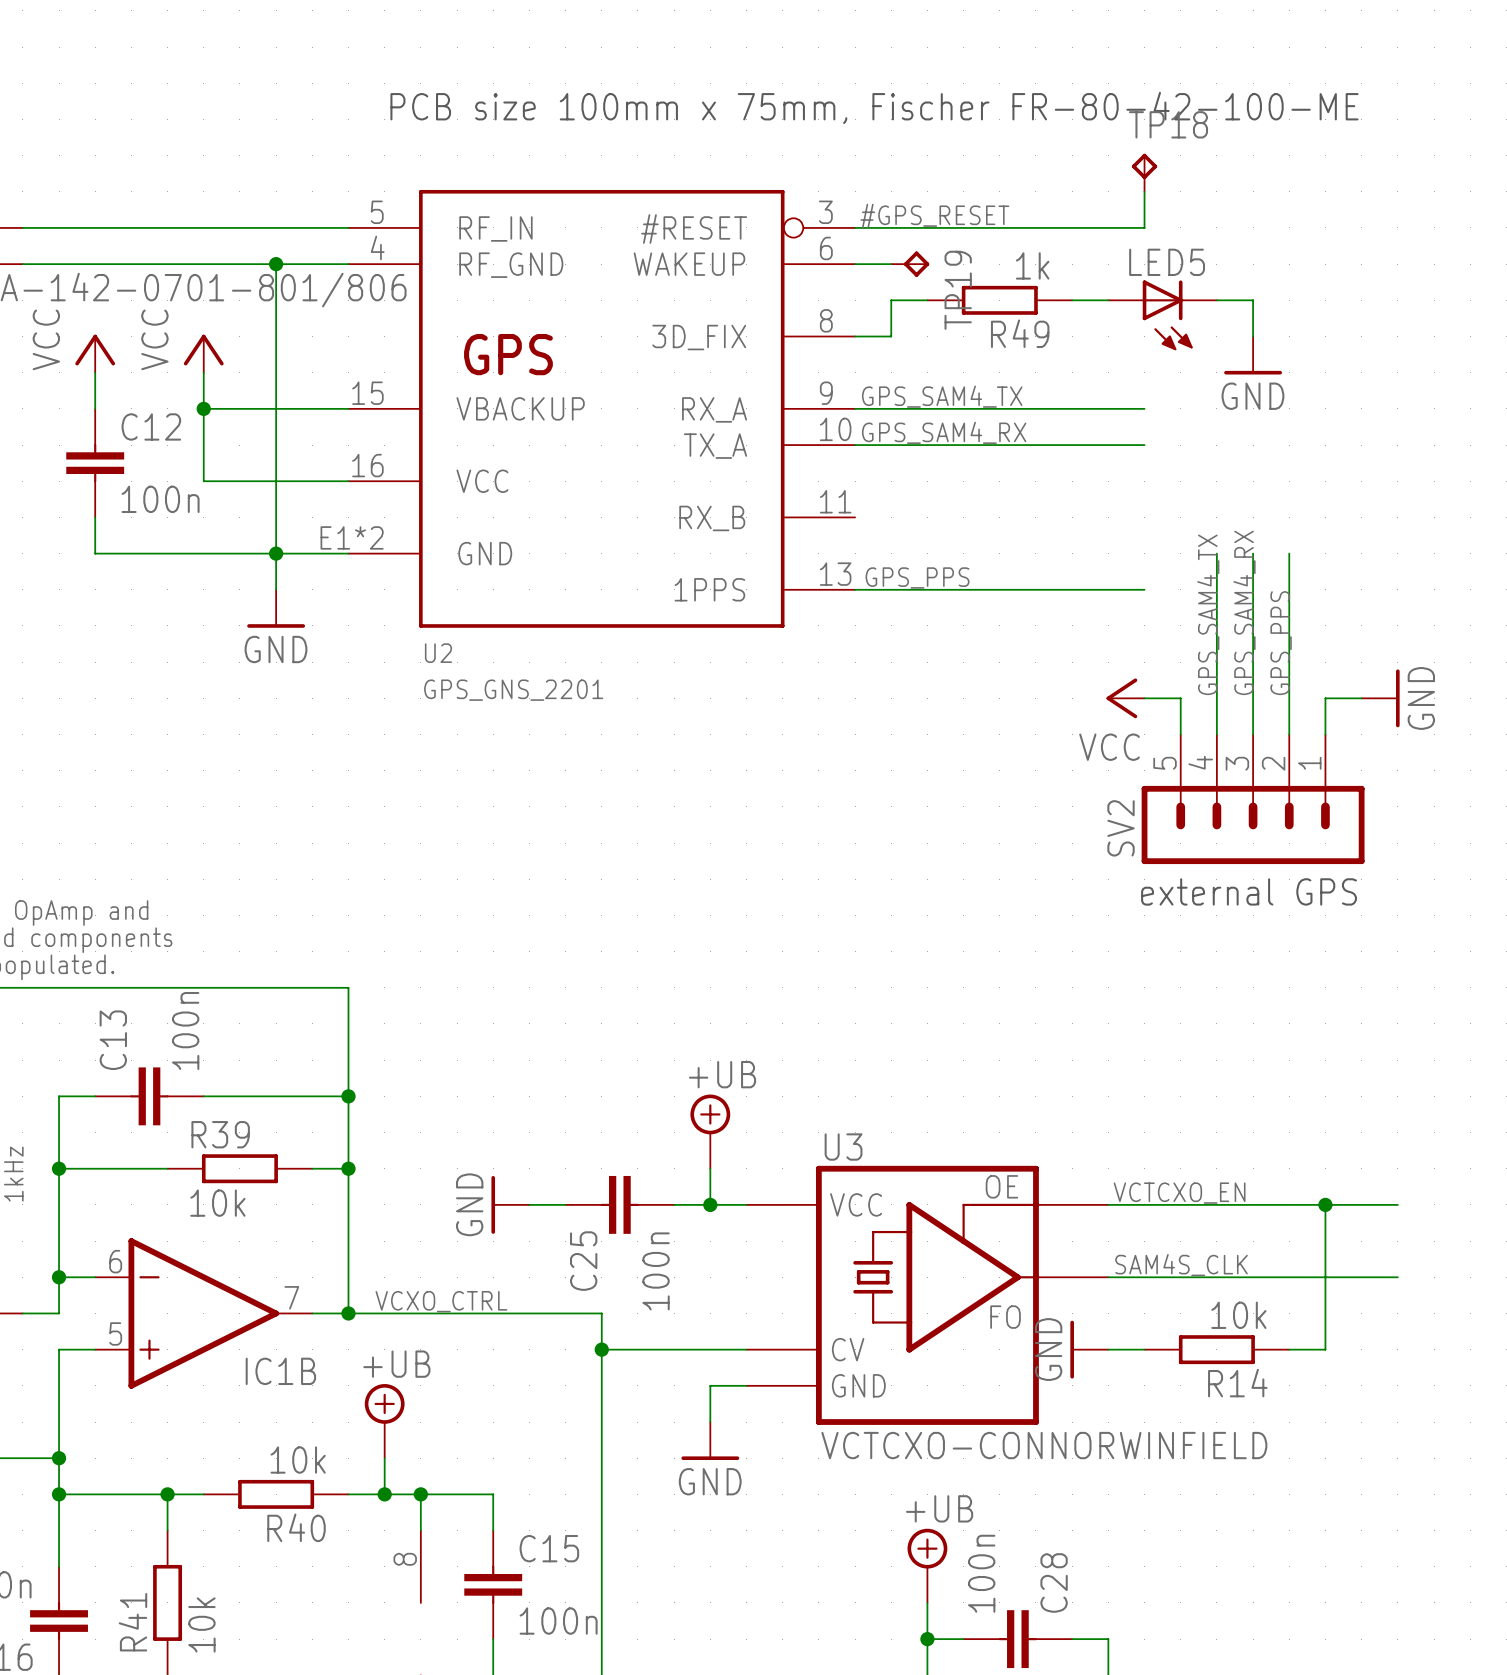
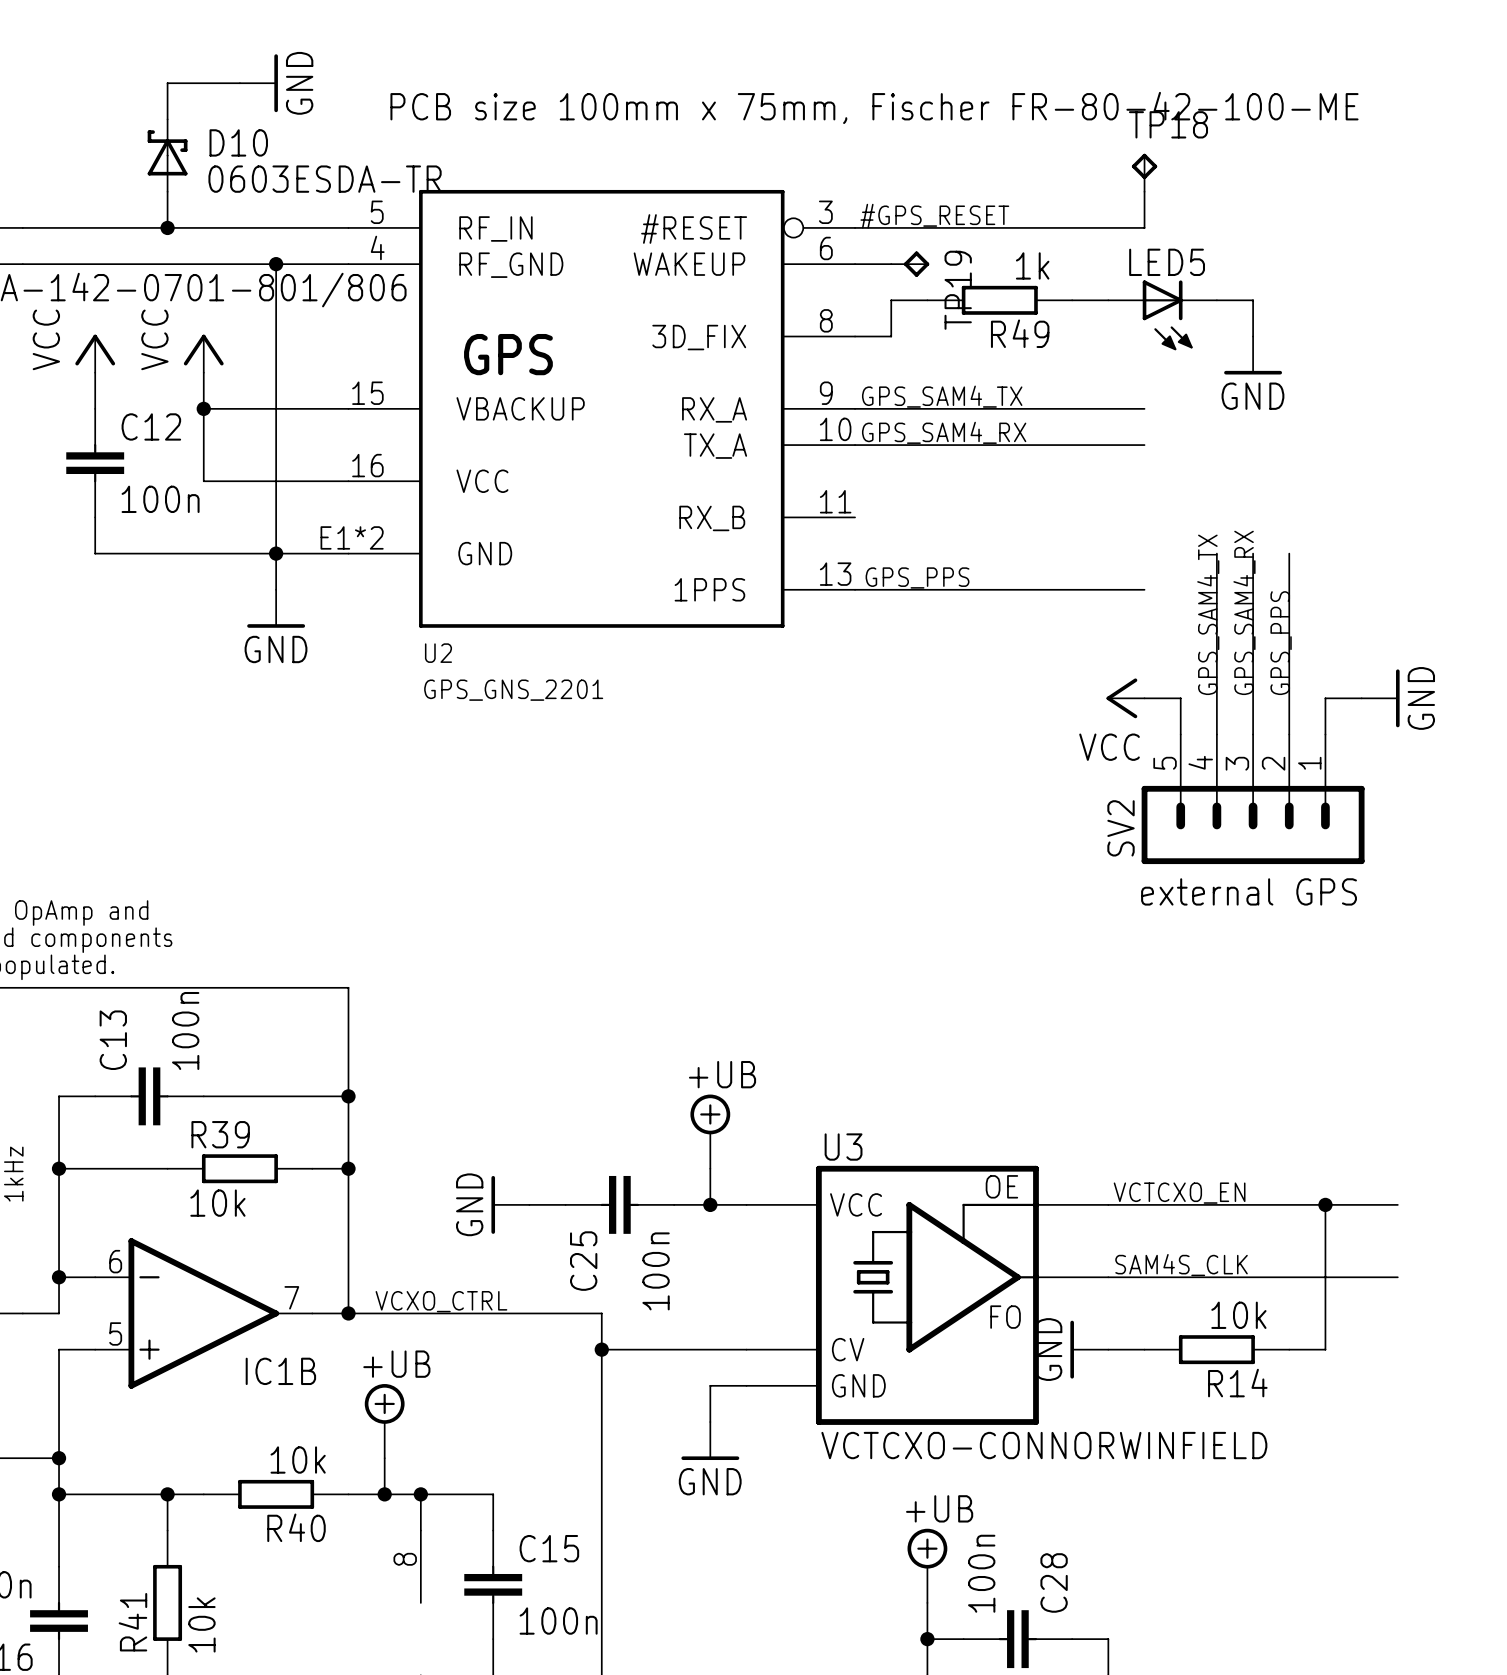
wire: none -> (239, 83) (167, 83) (167, 119)
power symbol: none -> GND (258, 83)
D10: none -> 0603ESDA-TR (167, 155)
wire: none -> (167, 191) (167, 227)
junction: none -> (167, 227)

